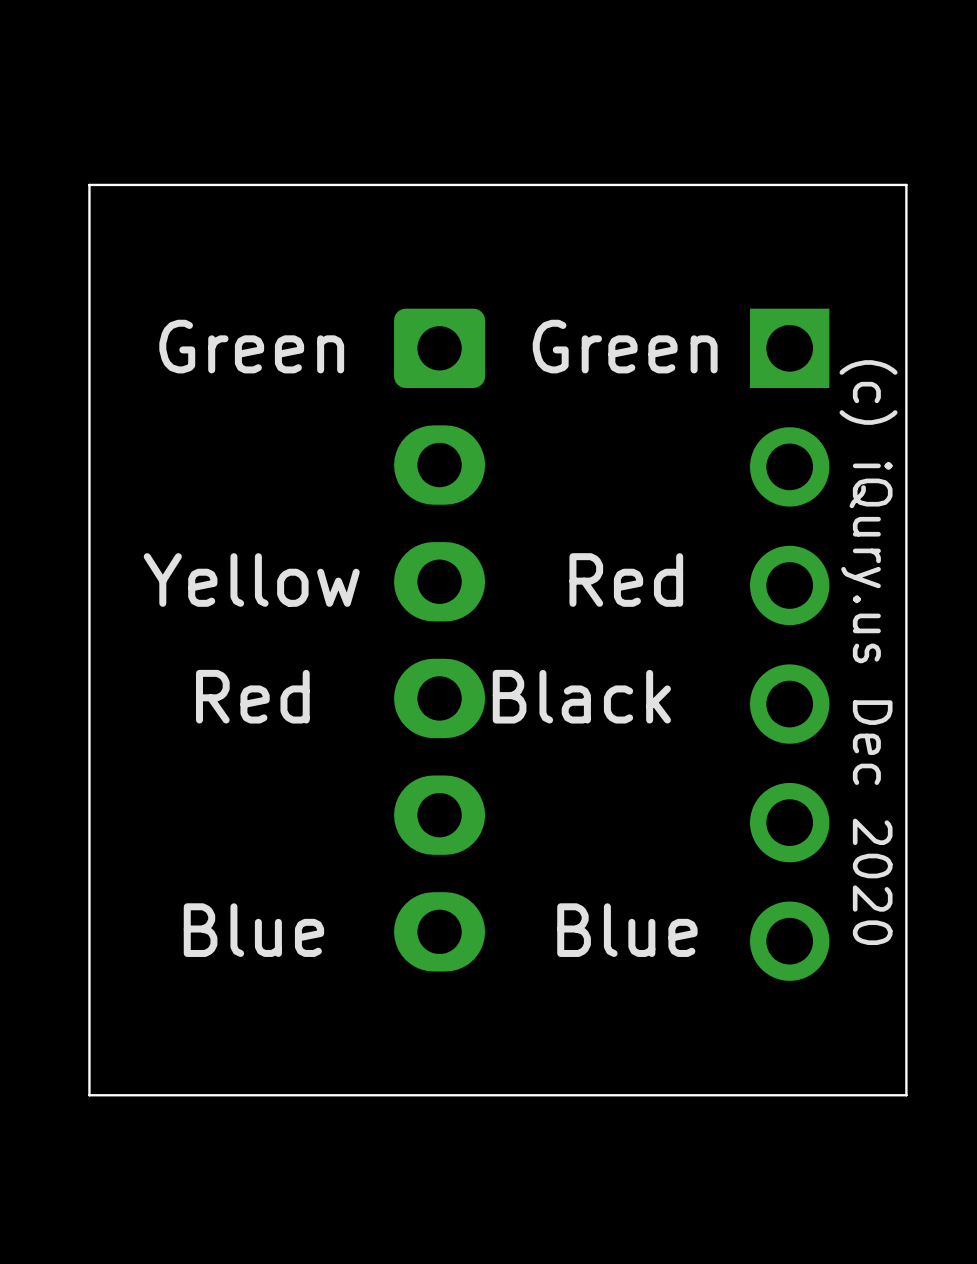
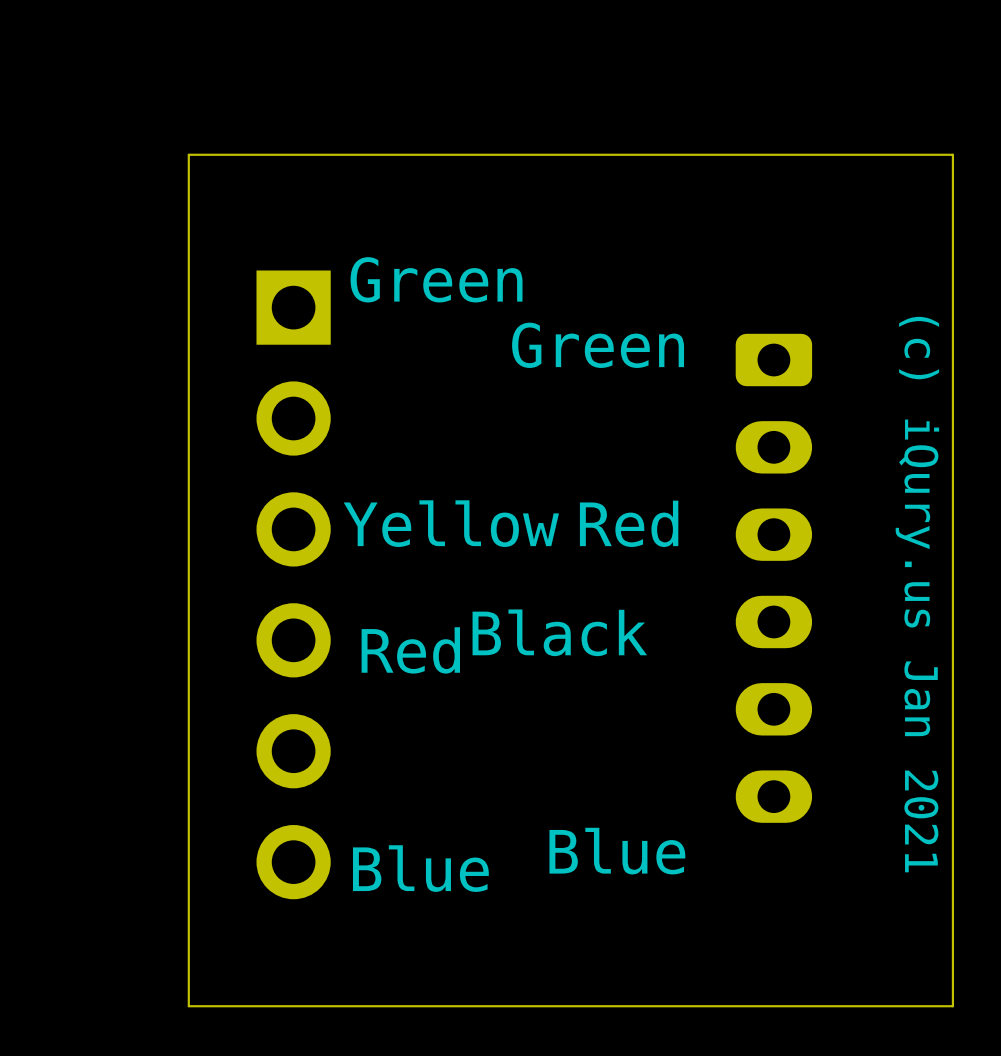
text position: Green (251, 346) -> Green (436, 279)
text position: Green (625, 346) -> Green (598, 345)
text position: Yellow (251, 580) -> Yellow (451, 523)
text position: Red (626, 580) -> Red (629, 523)
part: none -> (773, 578)
part: (439, 640) -> none
part position: (789, 644) -> (293, 584)
text: (c) iQury.us Dec 2020 (868, 652) -> (c) iQury.us Jan 2021 (917, 594)
text position: Red (252, 696) -> Red (410, 650)
text position: Black (581, 696) -> Black (559, 632)
text position: Blue (253, 930) -> Blue (420, 868)
text position: Blue (627, 930) -> Blue (617, 851)

